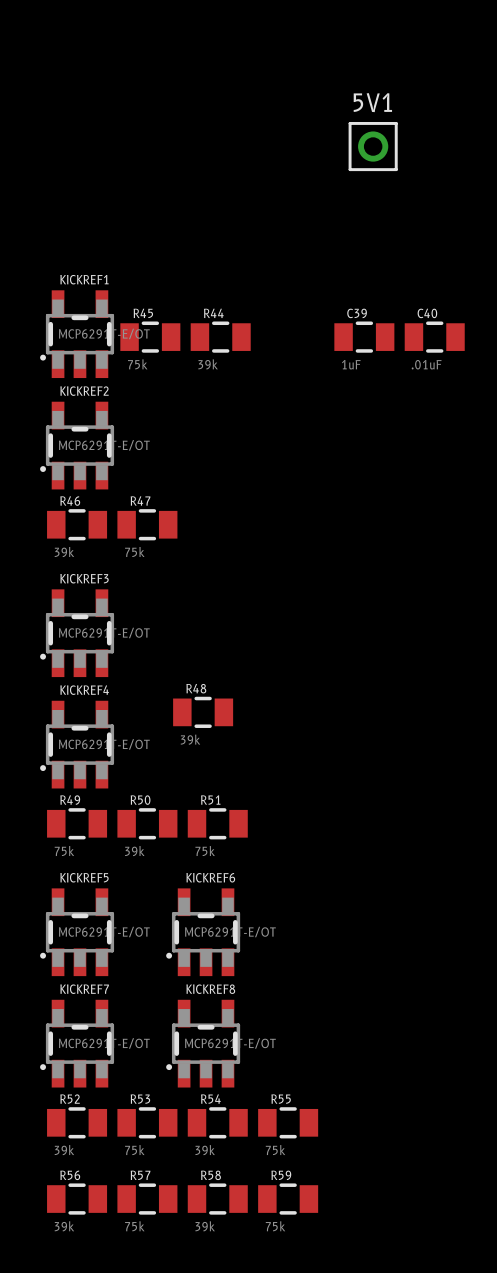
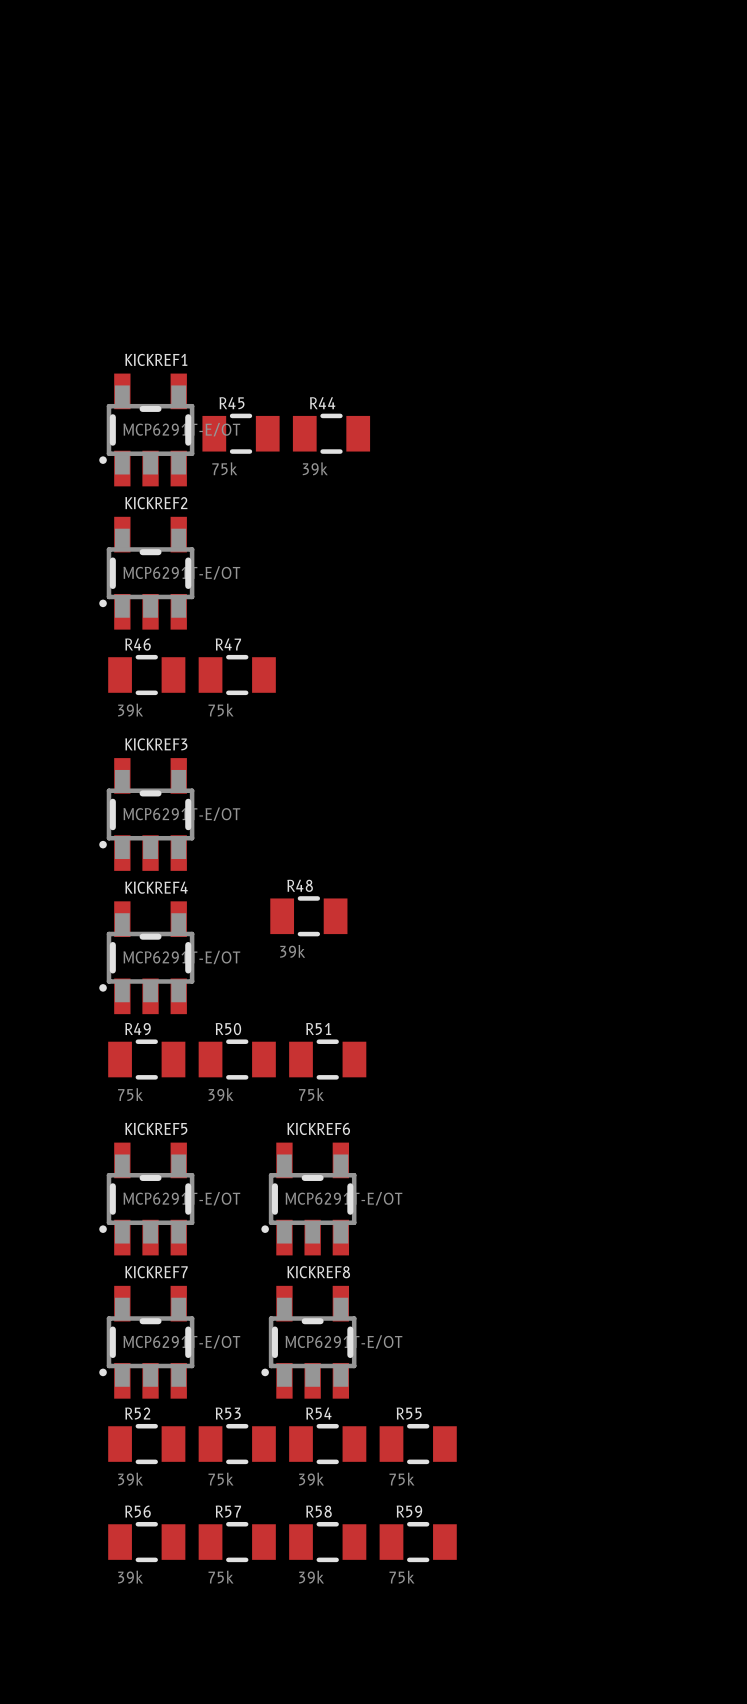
5V1: (373, 146) -> none
C39: 1uF (364, 337) -> none
C40: .01uF (434, 337) -> none

